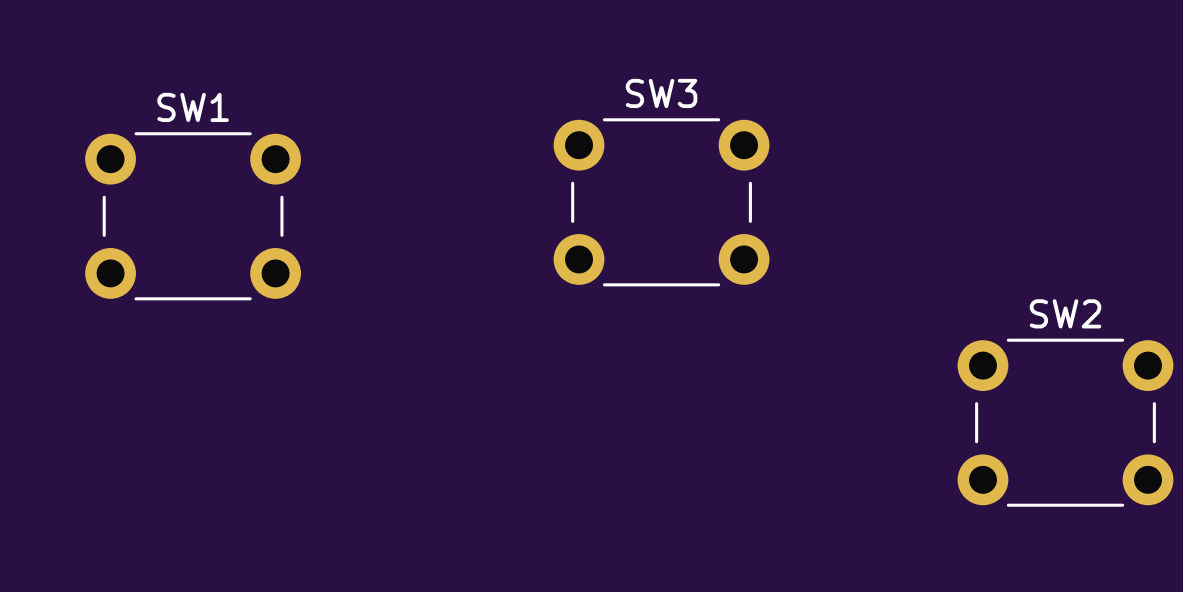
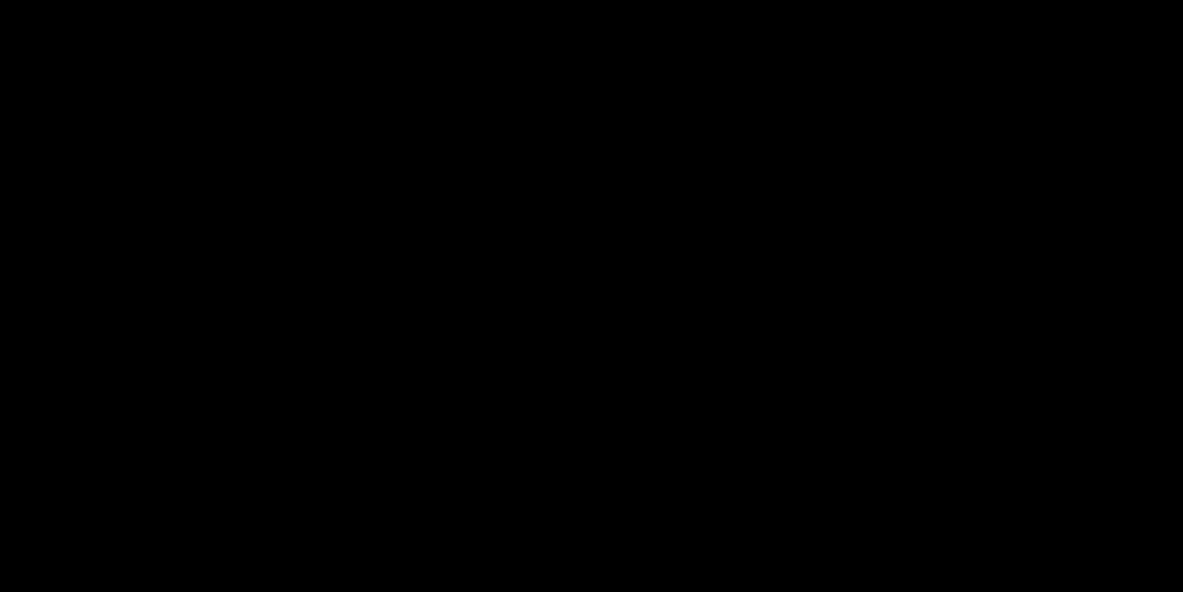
SW3: (661, 202) -> none
SW1: (193, 216) -> none
SW2: (1065, 422) -> none

